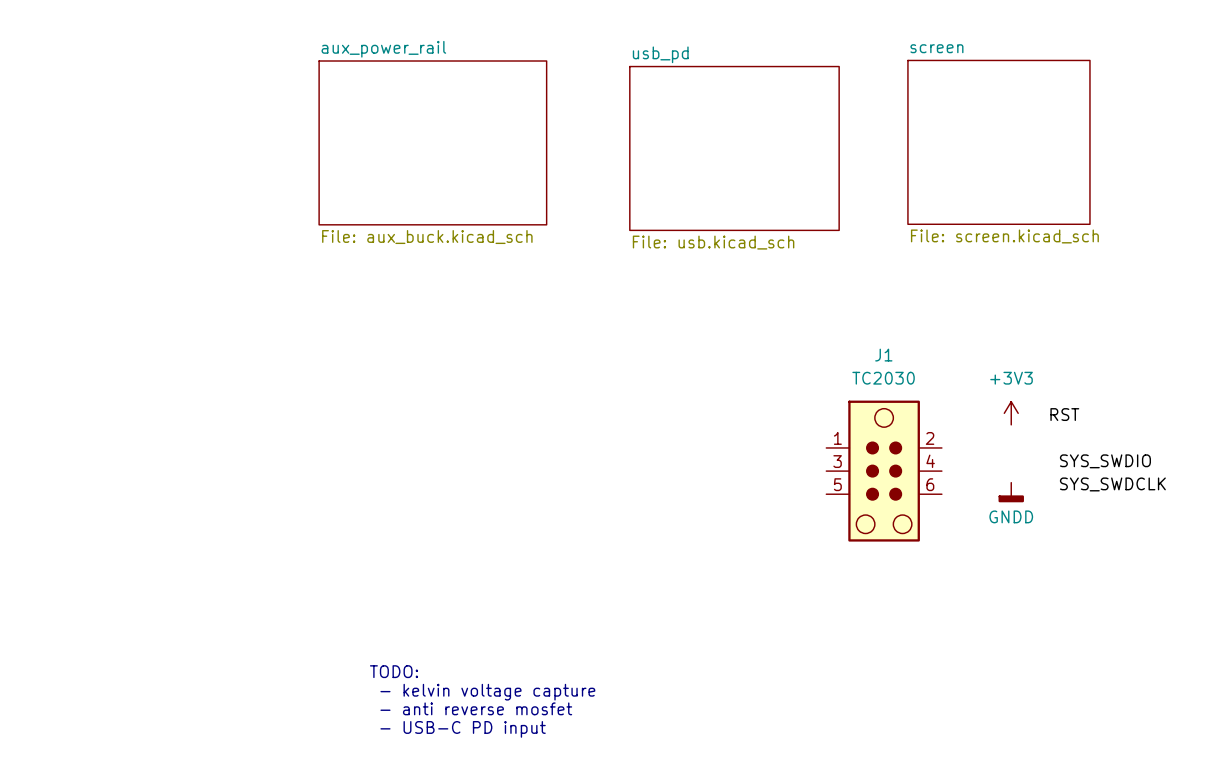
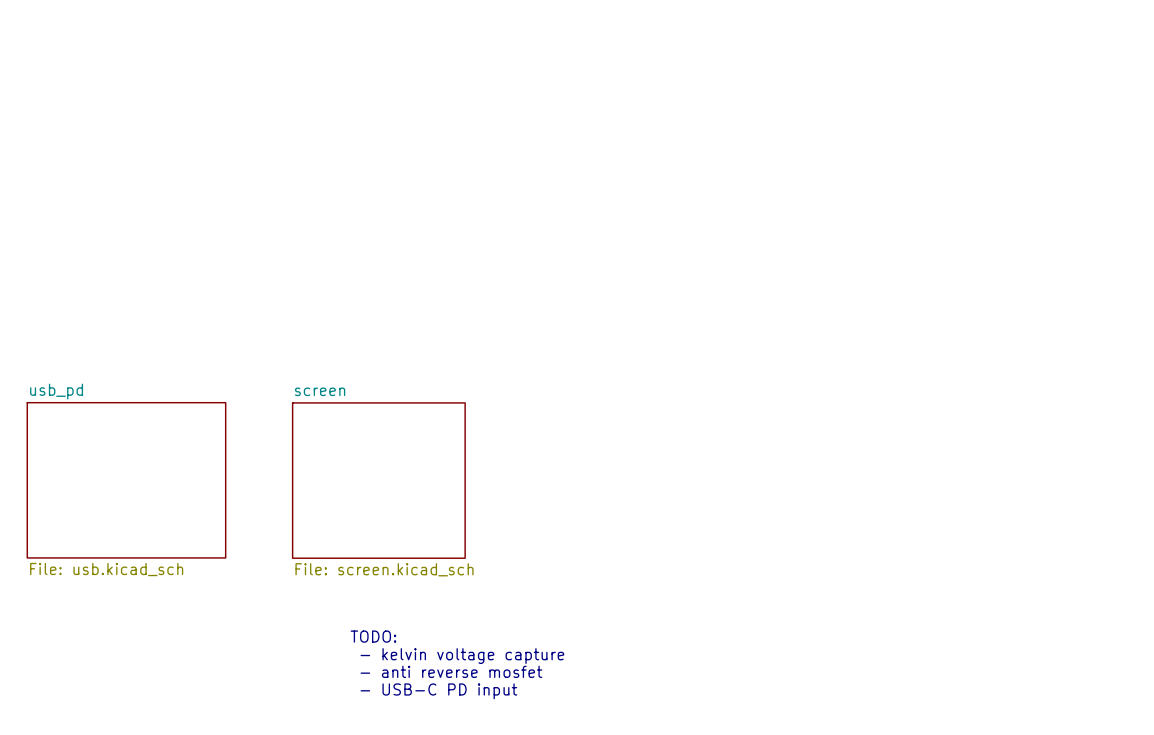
sheet aux_power_rail: File: aux_buck.kicad_sch (432, 142) -> none
sheet screen: File: screen.kicad_sch (998, 142) -> none
sheet usb_pd: File: usb.kicad_sch (734, 148) -> none
power symbol: +3V3 (1011, 413) -> none
label: RST (1064, 414) -> none
label: SYS_SWDIO (1105, 461) -> none
J1: TC2030 (884, 471) -> none
label: SYS_SWDCLK (1112, 484) -> none
power symbol: GNDD (1011, 492) -> none
sheet usb_pd: none -> File: usb.kicad_sch (126, 480)
sheet screen: none -> File: screen.kicad_sch (378, 480)

